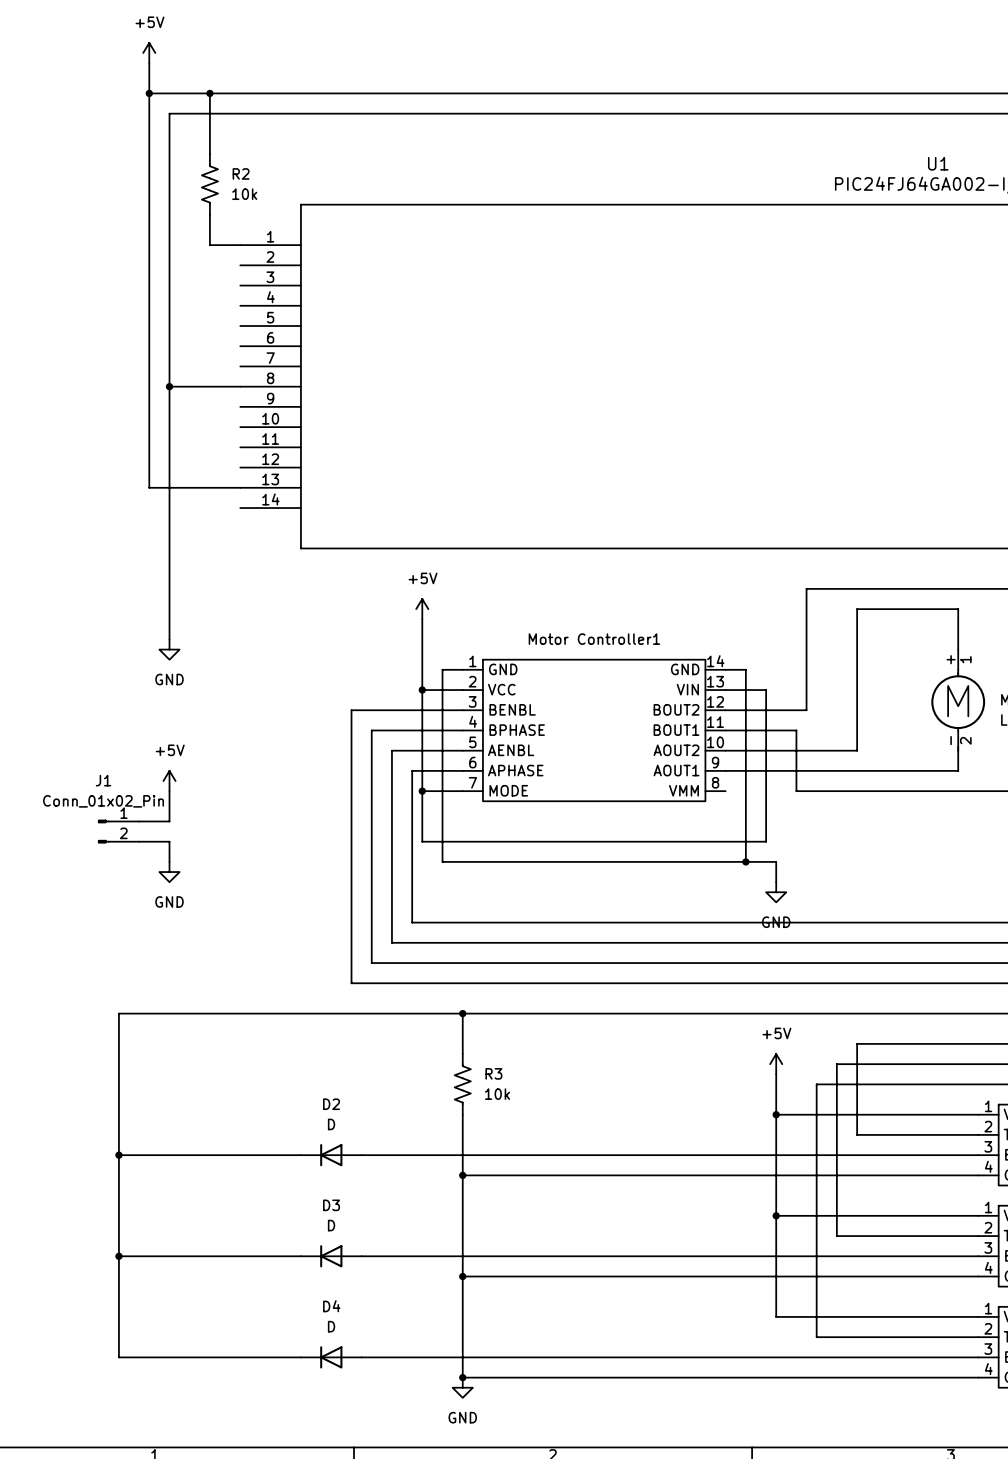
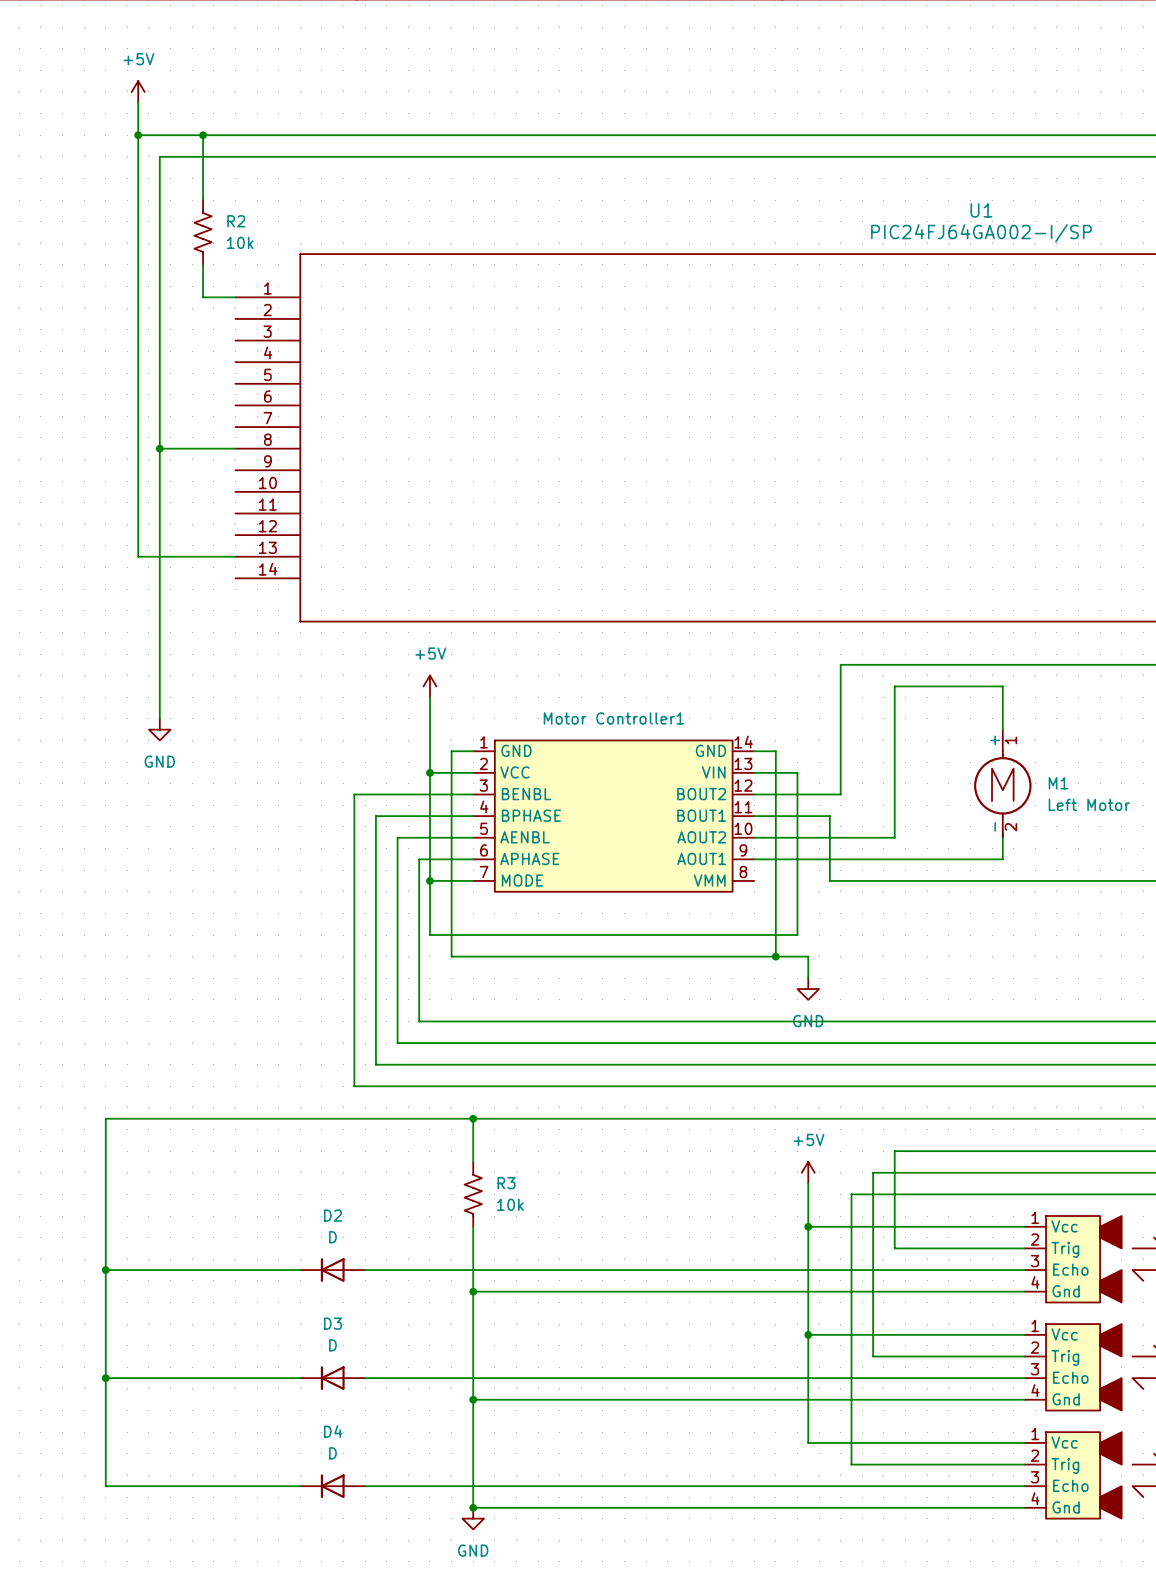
power symbol: +5V (169, 781) -> none
wire: (169, 791) (169, 821) (139, 821) -> none
J1: Conn_01x02_Pin (118, 831) -> none
wire: (139, 841) (169, 841) (169, 861) -> none
power symbol: GND (169, 872) -> none

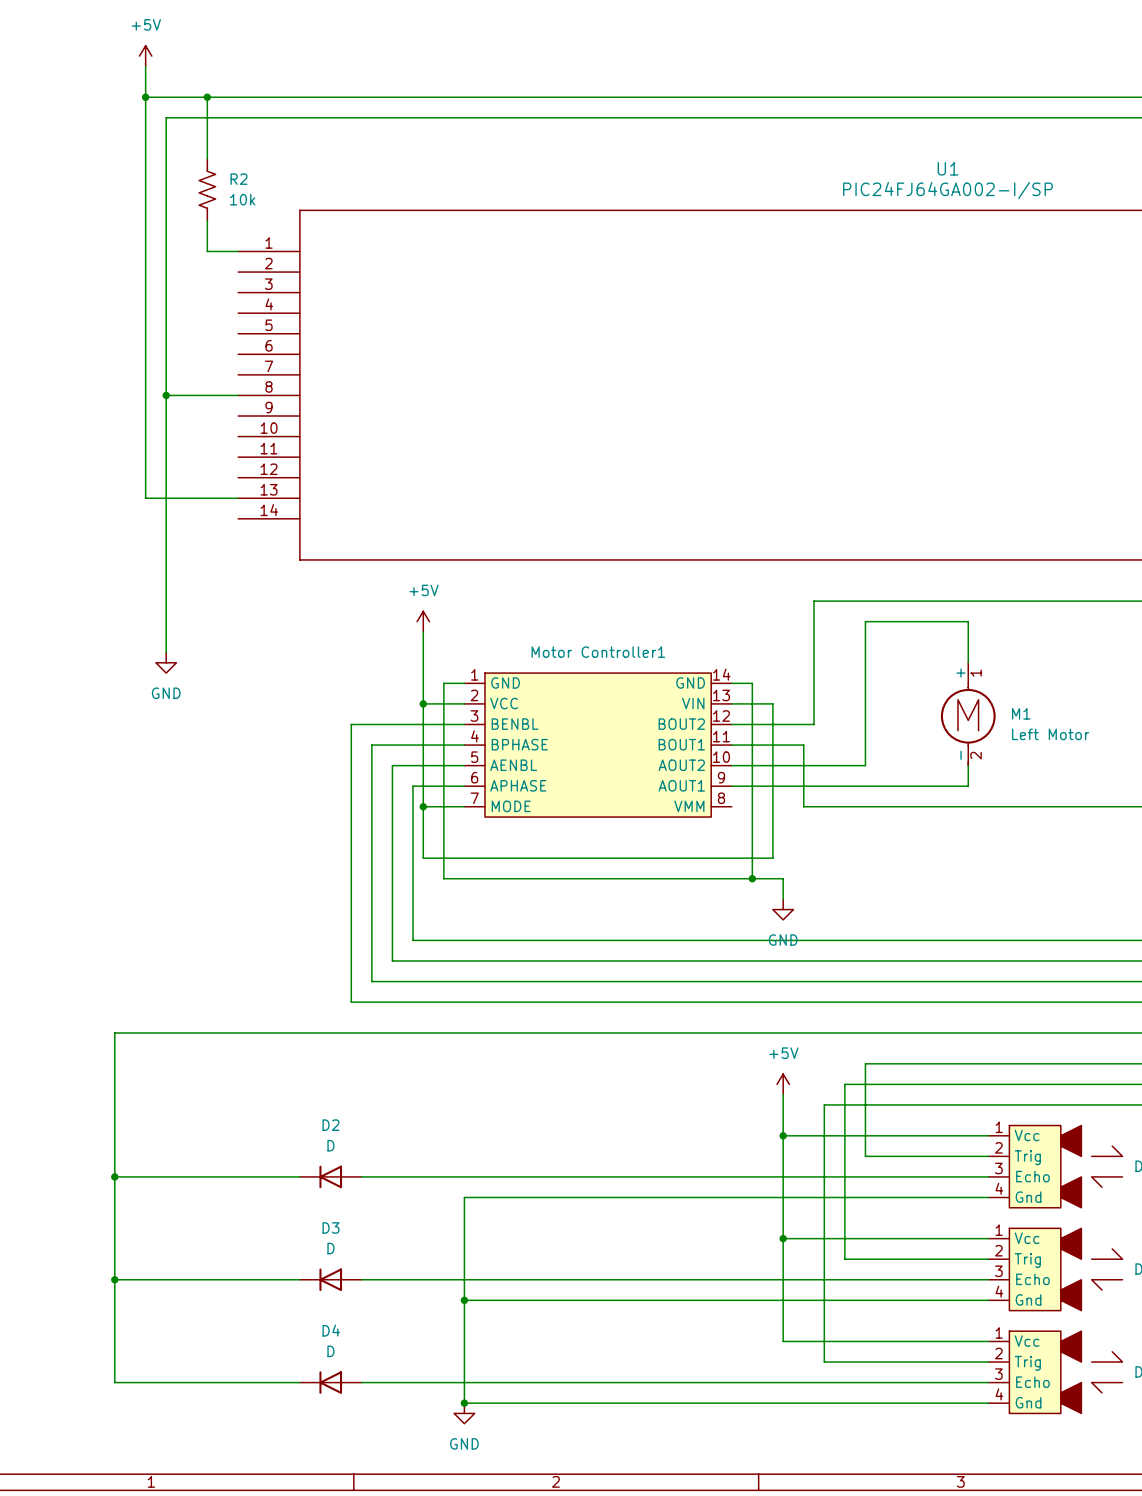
wire: (473, 1118) (473, 1161) -> none
junction: (473, 1118) -> none
R3: 10k (473, 1194) -> none
wire: (473, 1226) (473, 1291) -> none
junction: (473, 1291) -> none

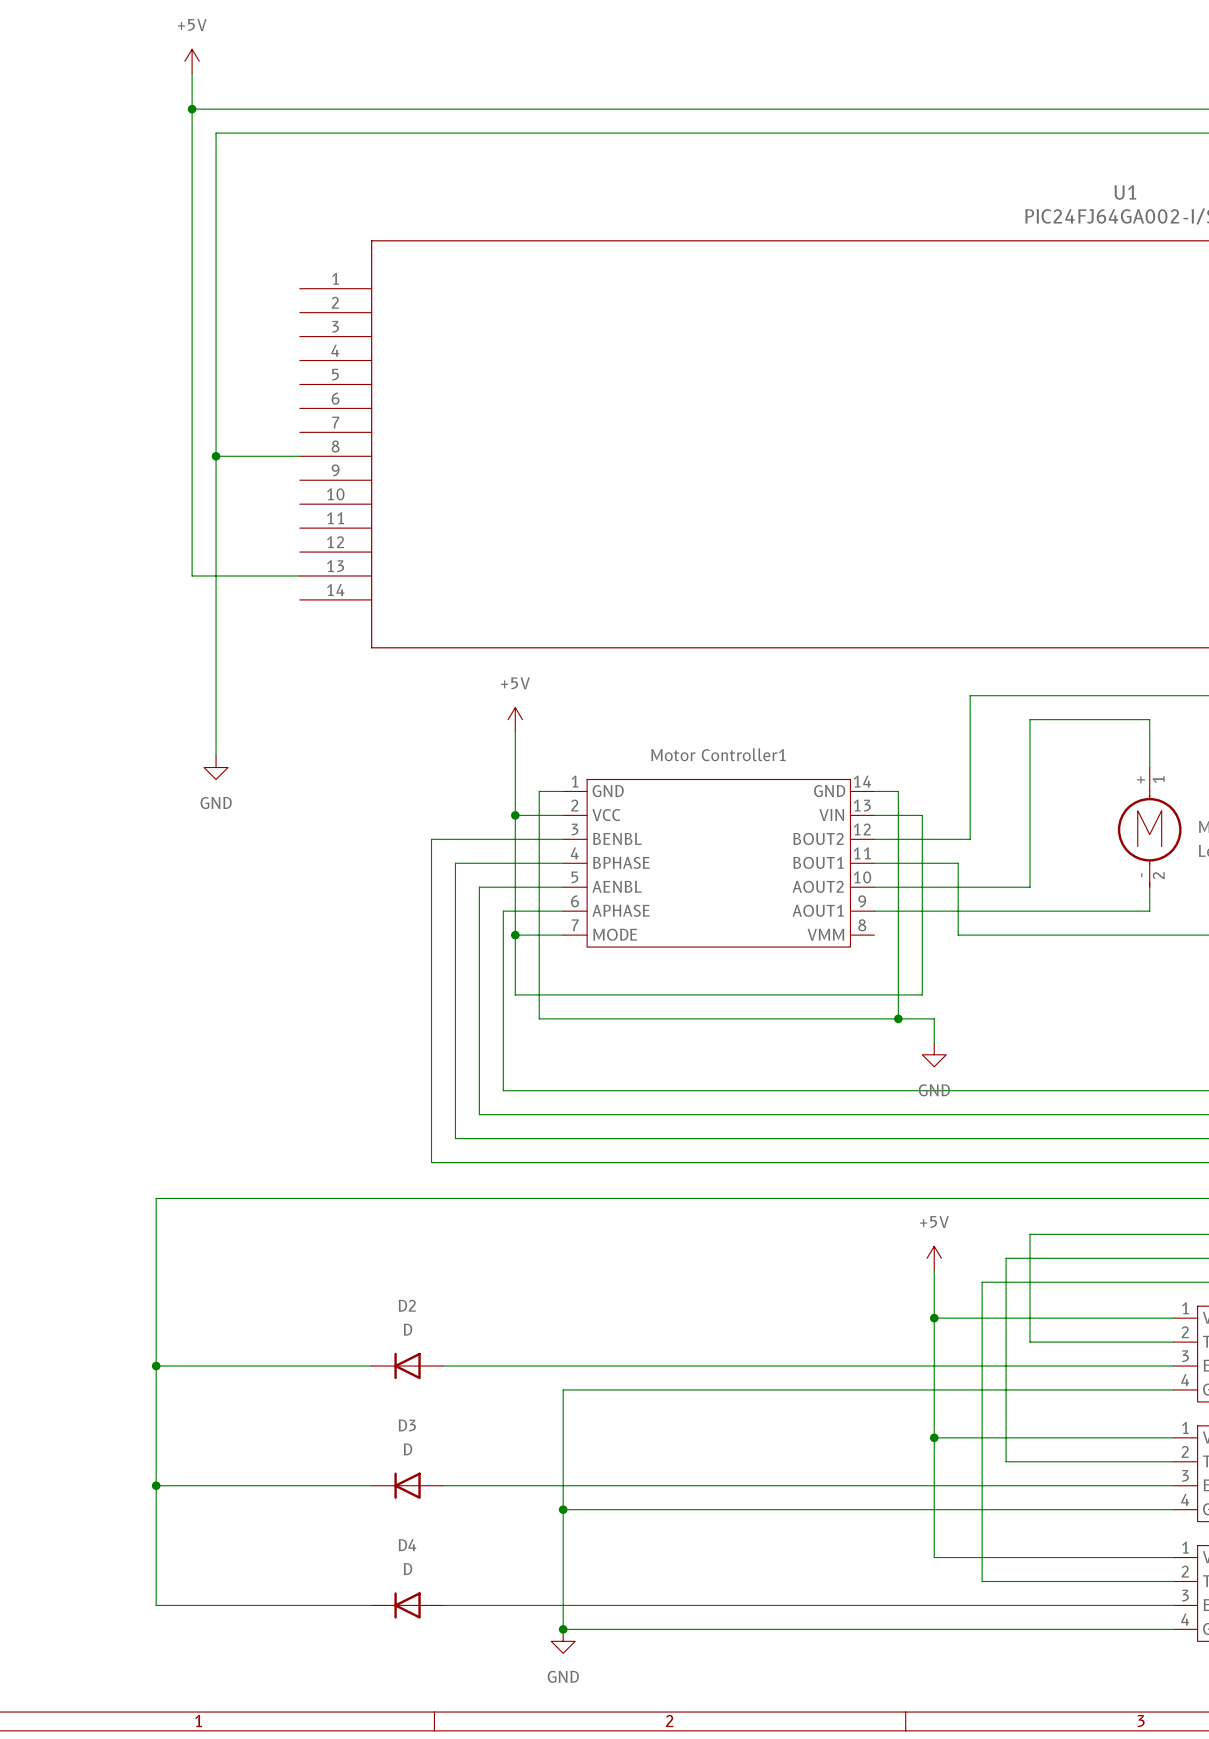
wire: (207, 97) (207, 158) -> none
junction: (207, 97) -> none
R2: 10k (207, 189) -> none
wire: (207, 220) (207, 251) (238, 251) -> none

